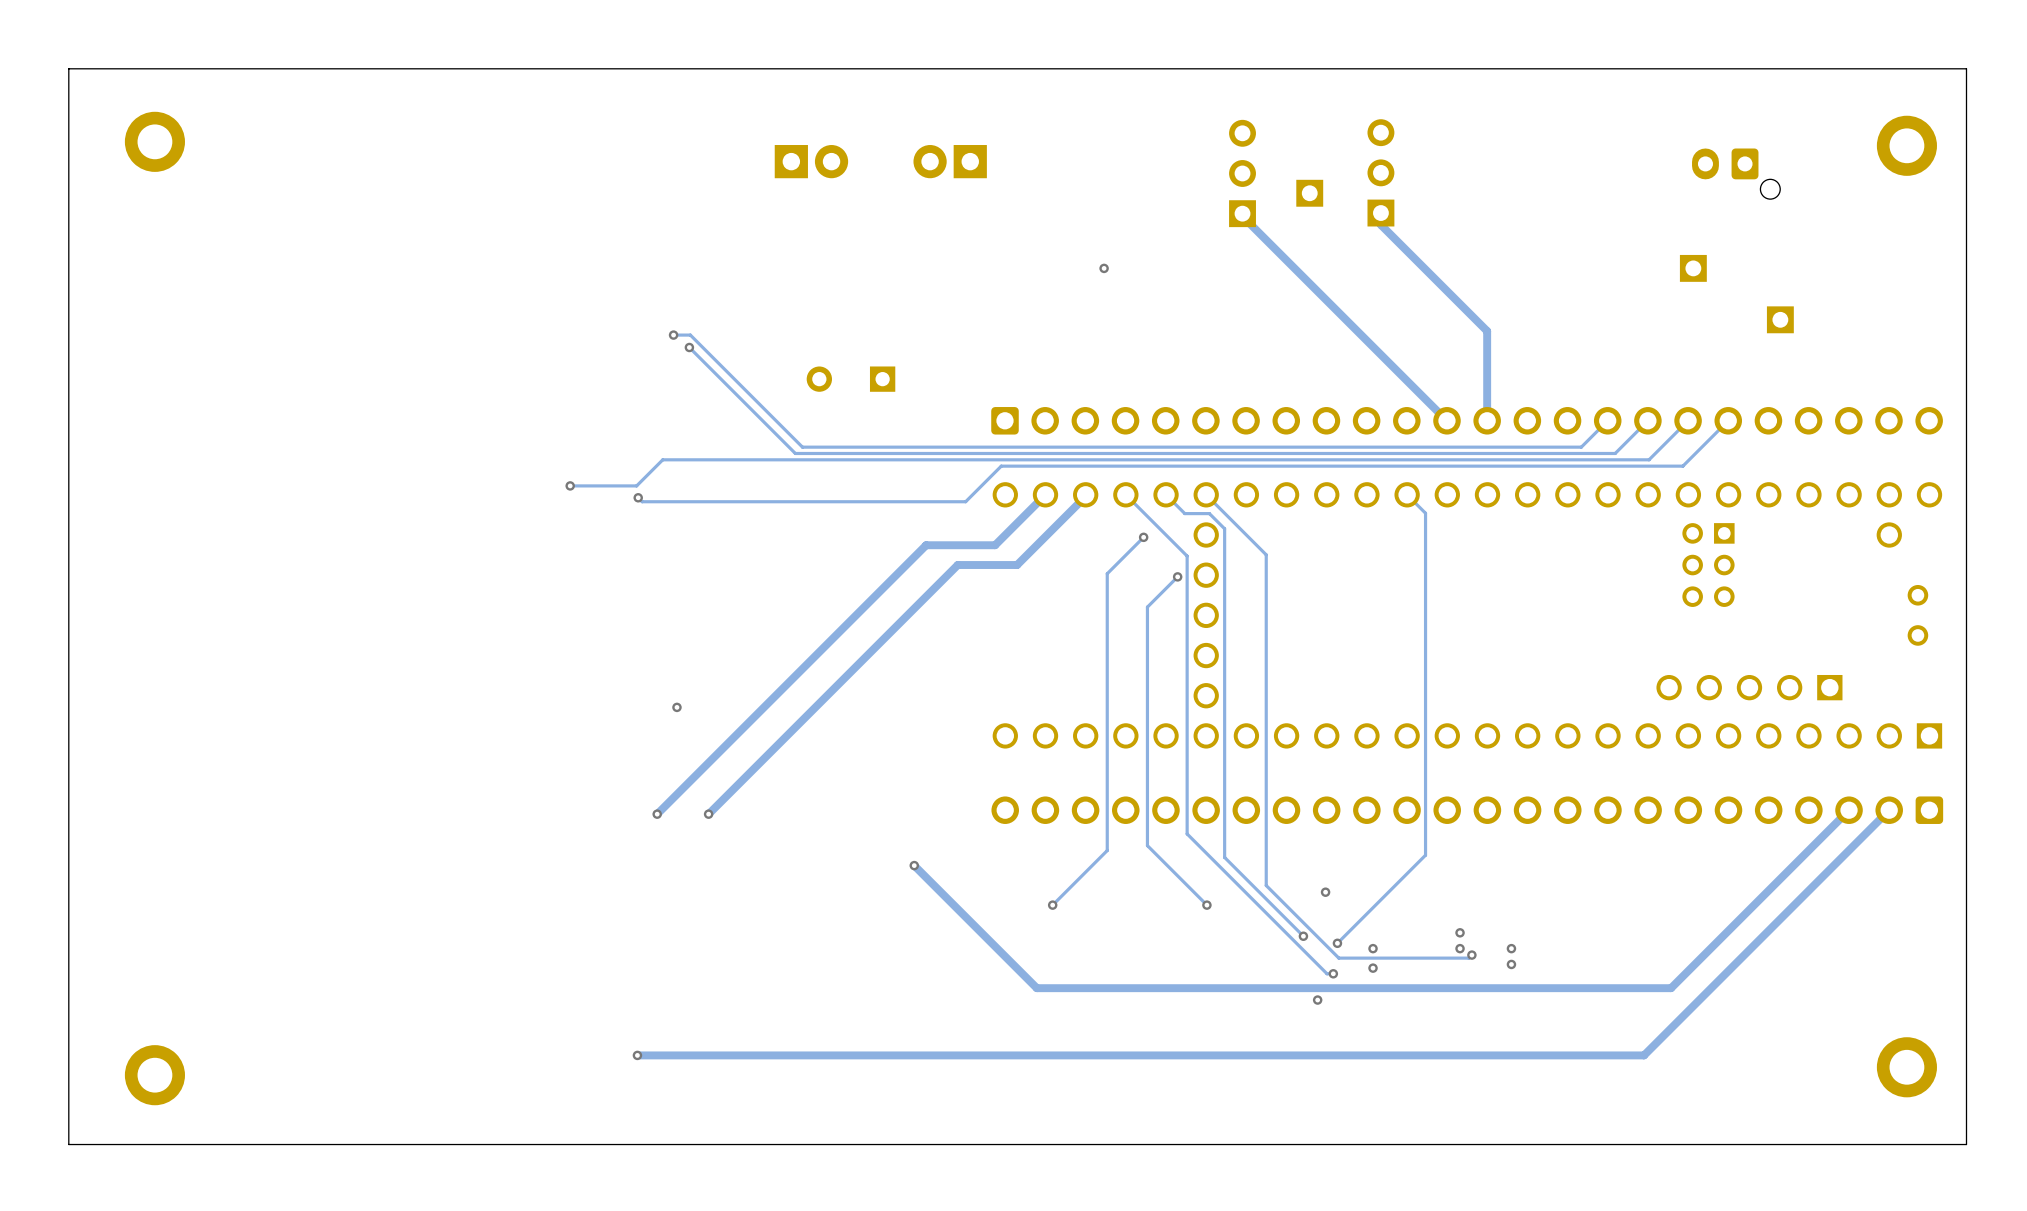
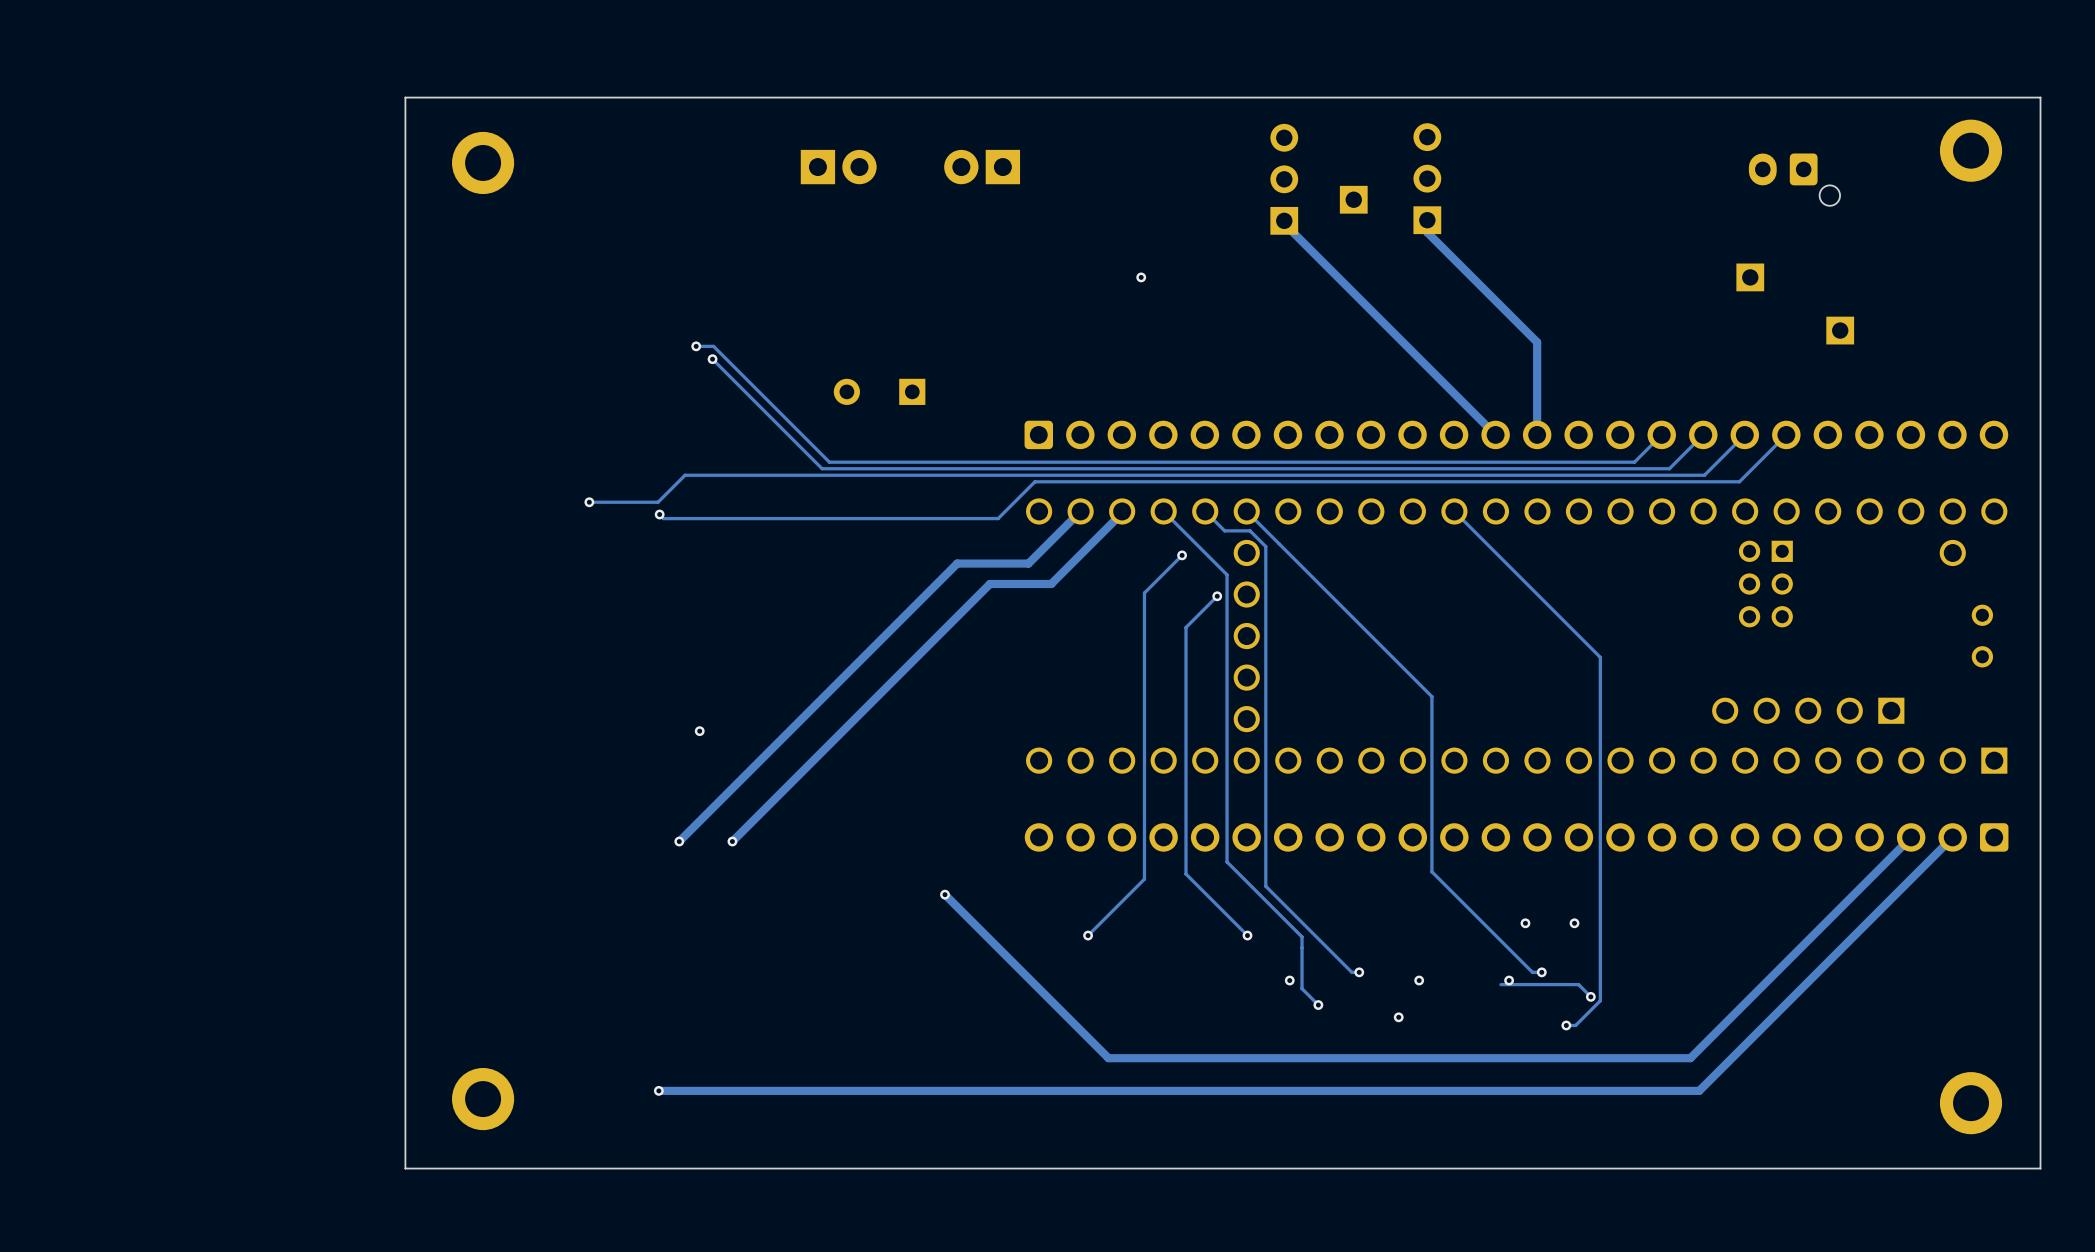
board edge: (1966, 68) (68, 68) (68, 1144) (1966, 1144) (1966, 68) -> (2040, 97) (2040, 1168) (405, 1168) (405, 97) (2040, 97)
part position: (154, 141) -> (483, 162)
track: (1425, 513) (1425, 855) (1337, 943) -> (1473, 530) (1600, 657) (1600, 1000) (1575, 1025) (1566, 1025)
track: (1266, 554) (1266, 885) (1338, 958) (1468, 958) (1471, 955) -> (1308, 573) (1431, 696) (1431, 871) (1532, 972) (1541, 972)
via: (1325, 892) -> none
via: none -> (1525, 923)
via: none -> (1574, 923)
track: (1259, 906) (1327, 973) (1333, 973) -> (1302, 936) (1302, 988) (1318, 1005)
via: (1460, 932) -> none
track: none -> (1347, 967) (1351, 972) (1359, 972)
via: (1303, 936) -> none
via: none -> (1359, 972)
via: none -> (1541, 972)
via: (1337, 943) -> none
via: none -> (1289, 980)
via: (1511, 948) -> none
track: none -> (1500, 984) (1578, 984) (1590, 996)
via: (1471, 955) -> none
via: (1511, 964) -> none
via: none -> (1590, 996)
via: (1373, 968) -> none
via: none -> (1318, 1005)
via: (1333, 973) -> none
via: none -> (1398, 1017)
track: (1671, 988) (1036, 988) -> (1727, 1021) (1690, 1058) (1108, 1058) (1071, 1021)
via: none -> (1566, 1025)
via: (1317, 1000) -> none
part position: (154, 1075) -> (483, 1099)

